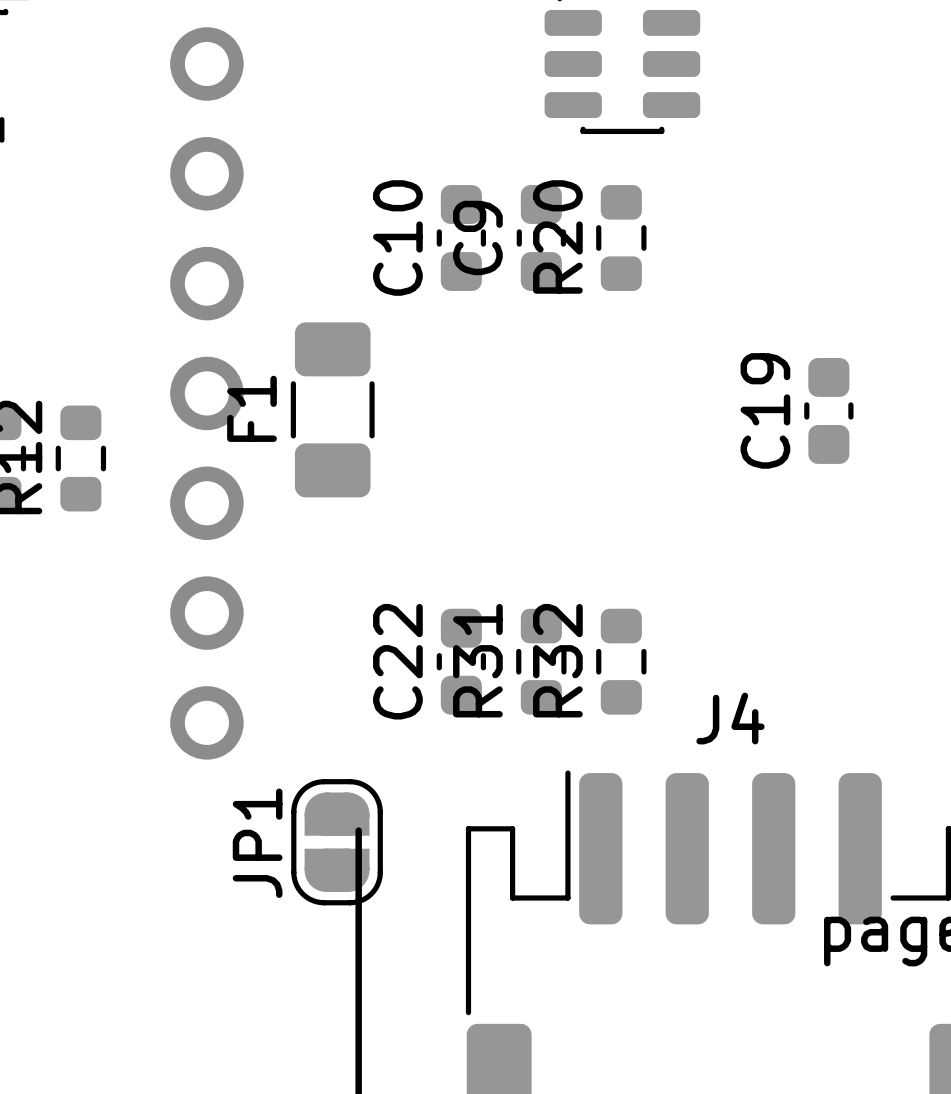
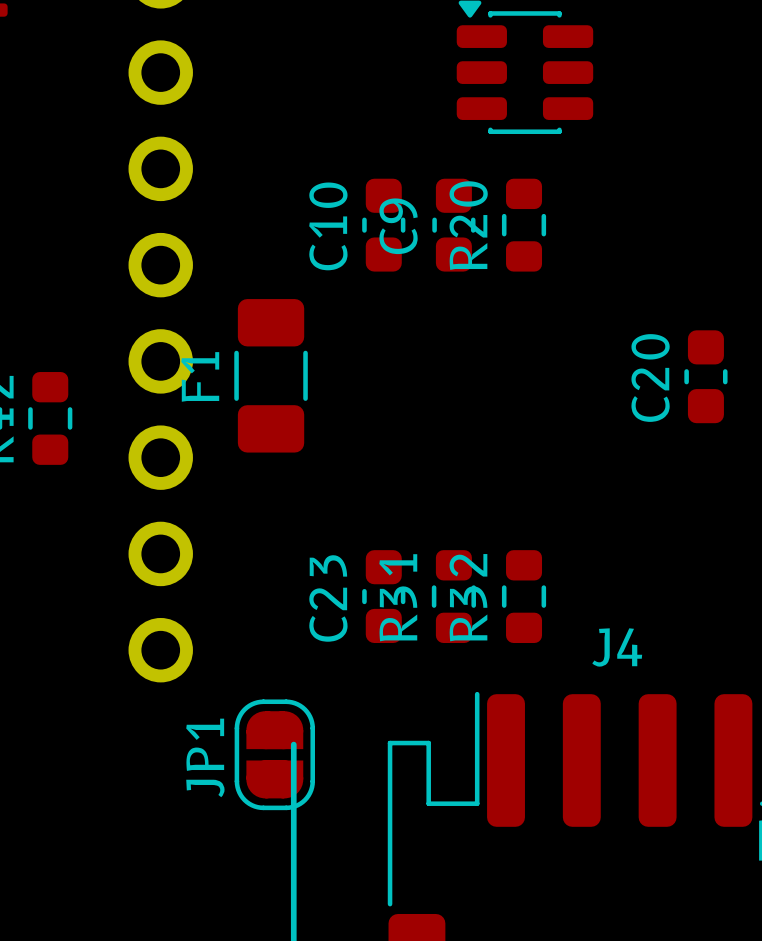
C19 name: C19 (765, 410) -> C20 (650, 378)
C22 name: C22 (397, 661) -> C23 (328, 598)

